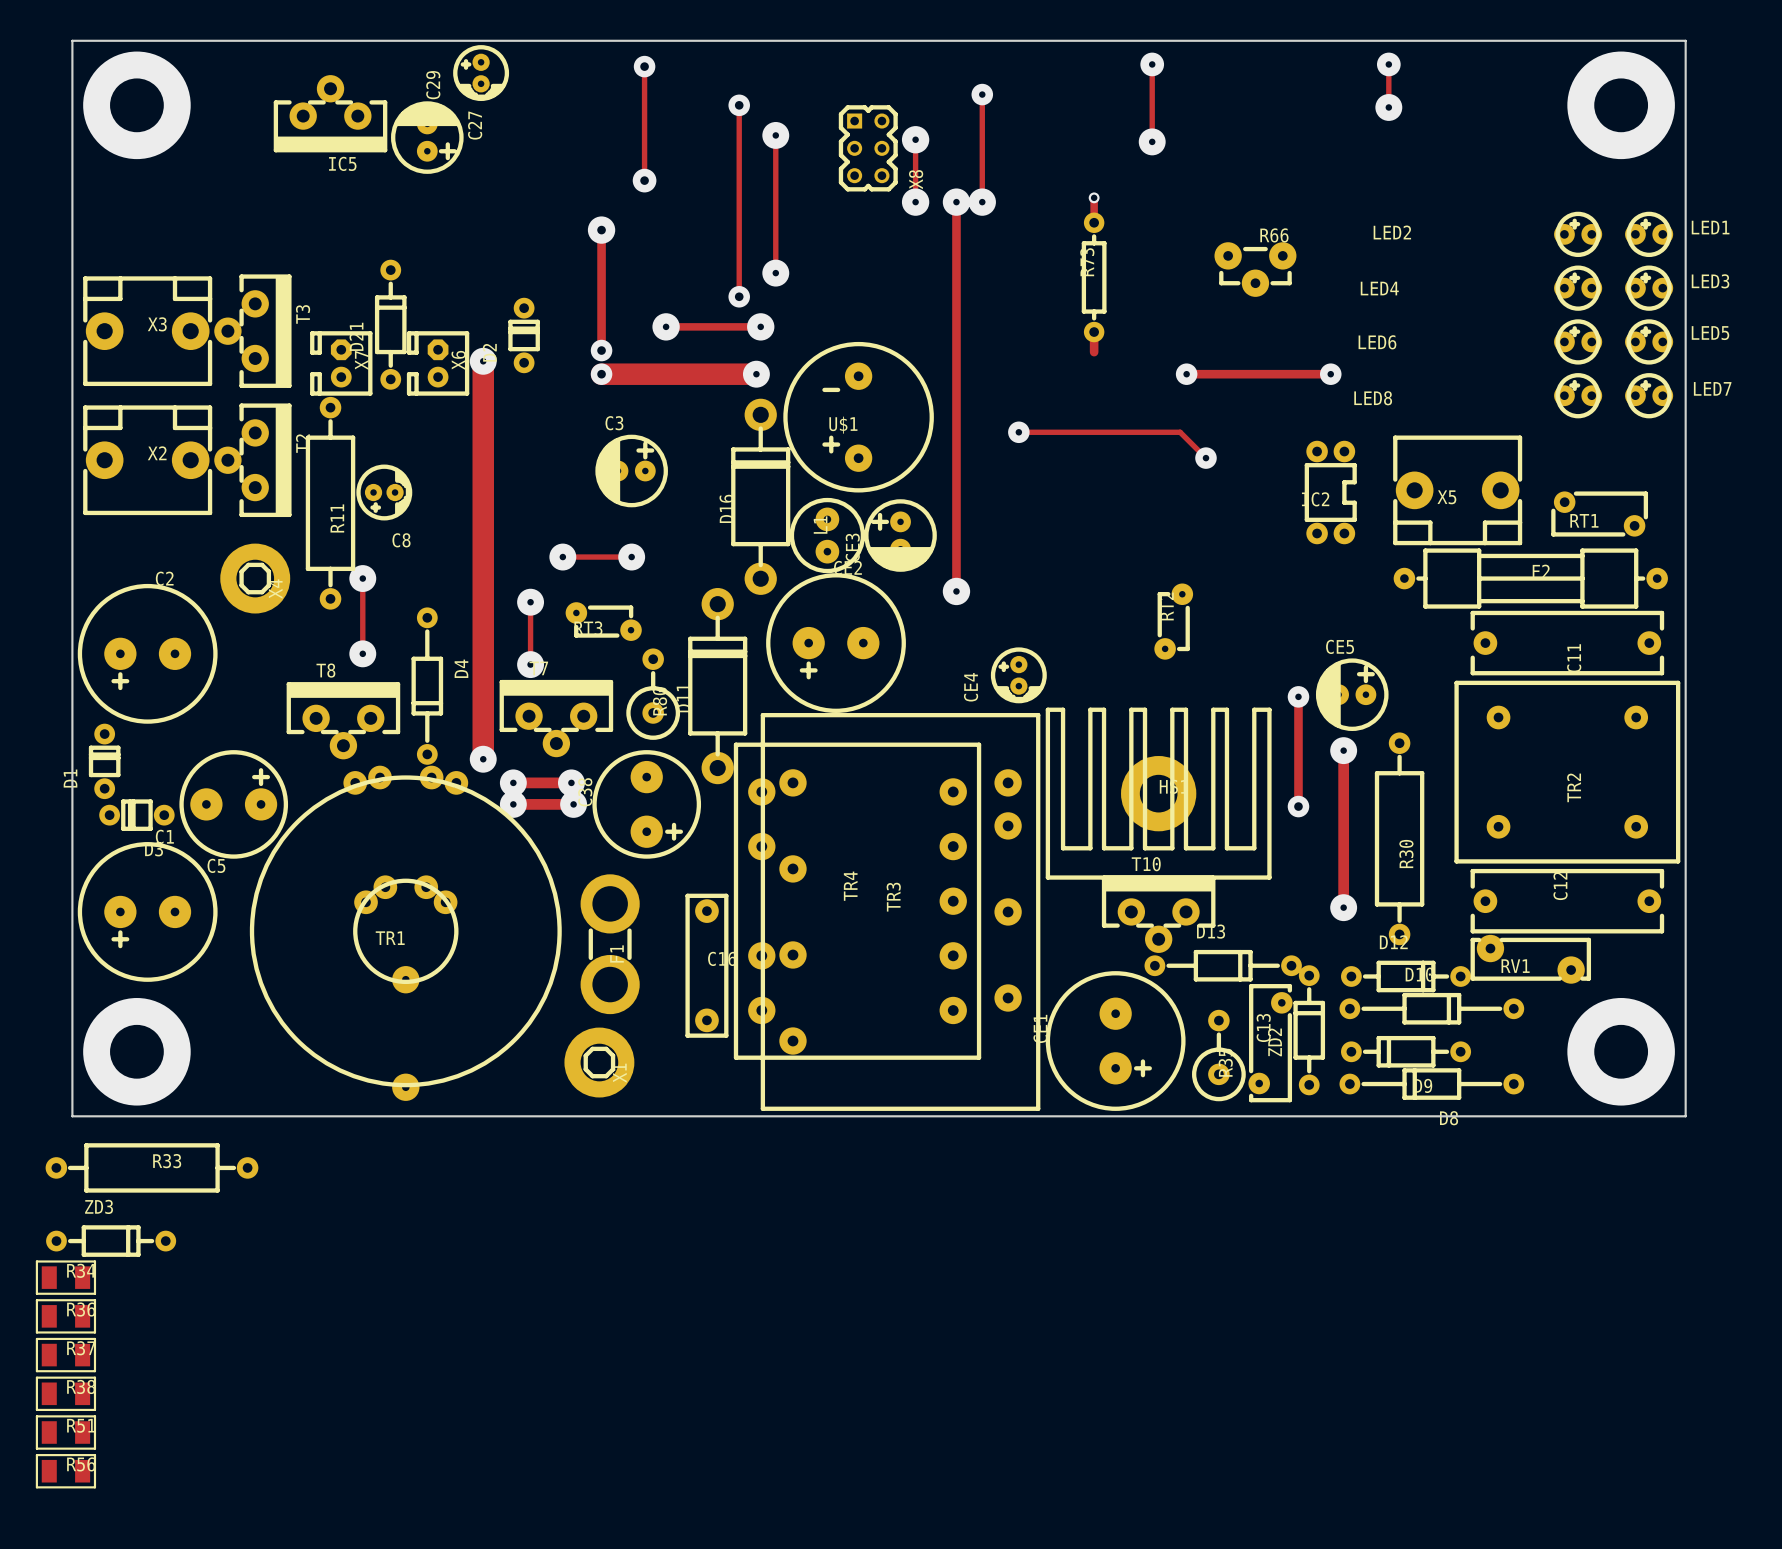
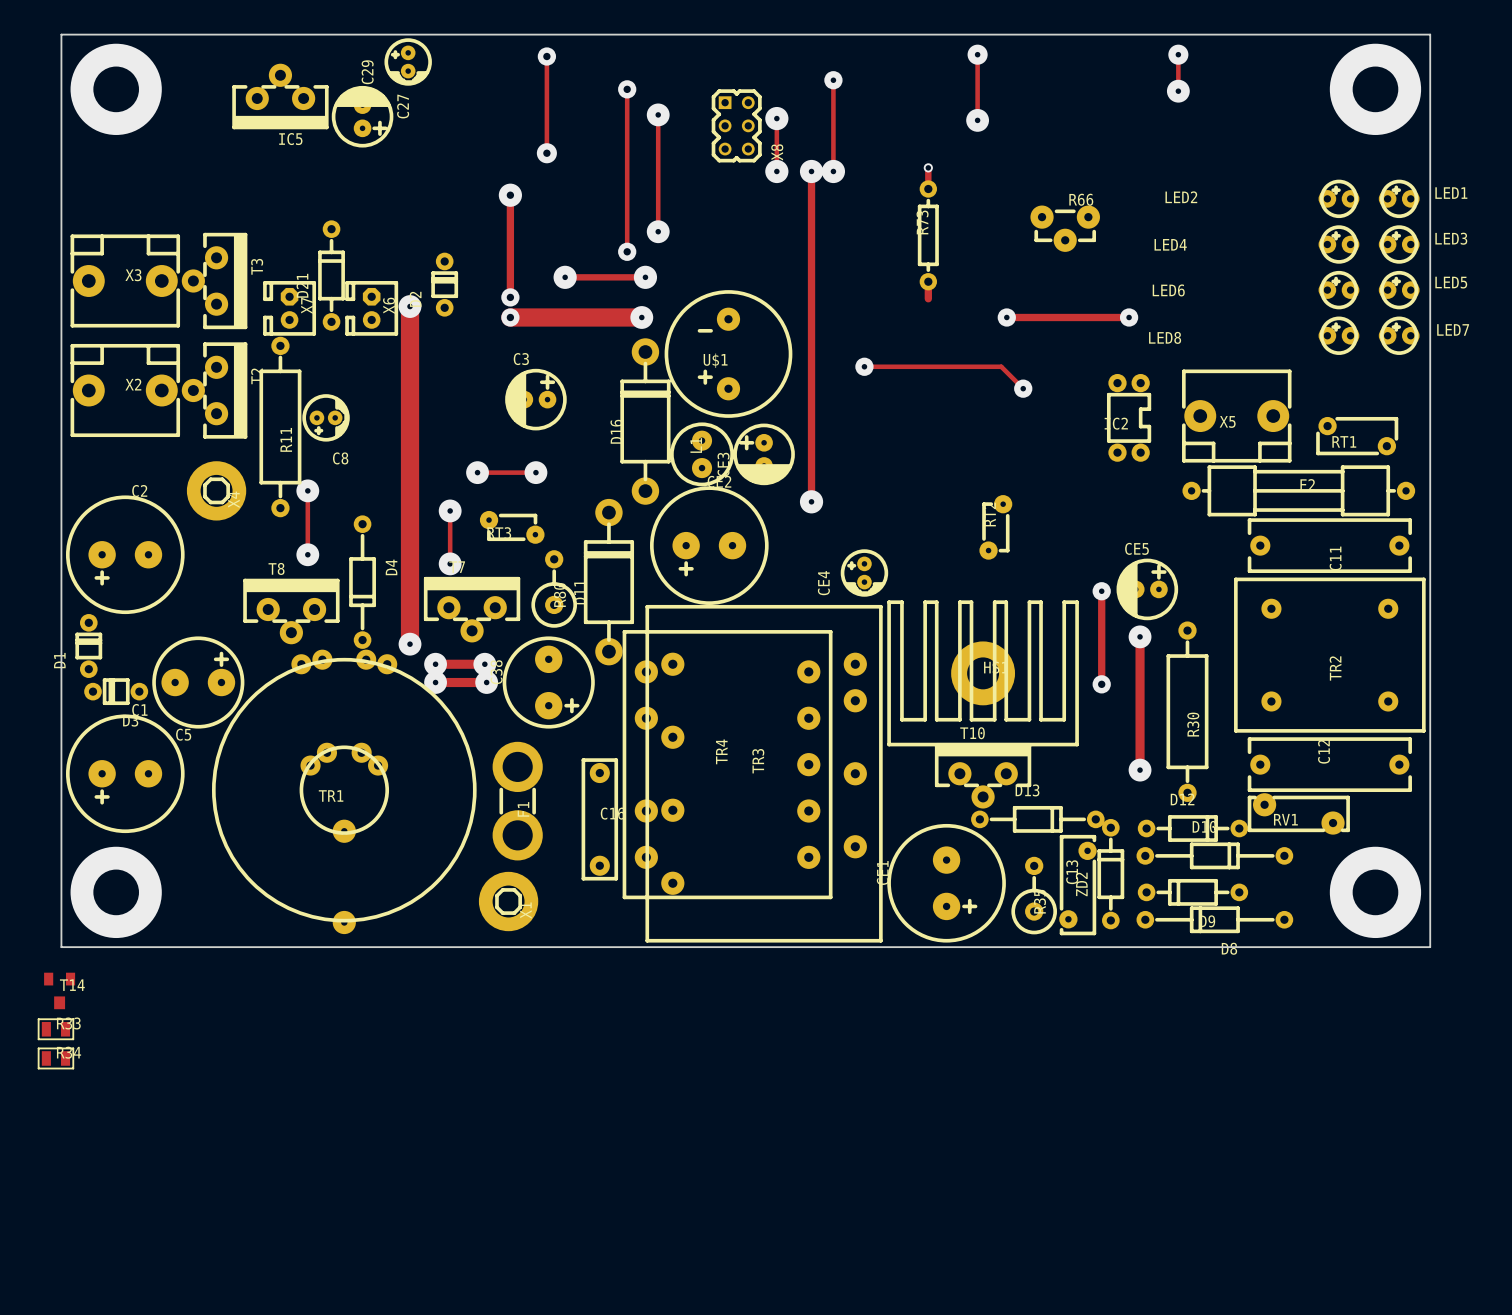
R33 footprint: [45, 1143, 259, 1193] -> [37, 1018, 75, 1041]
T14: none -> (59, 990)
ZD3: (111, 1241) -> none
R34 footprint: [35, 1260, 97, 1295] -> [37, 1047, 75, 1070]
R36: (65, 1316) -> none
R37: (65, 1355) -> none
R38: (65, 1393) -> none
R51: (65, 1432) -> none
R56: (65, 1471) -> none

